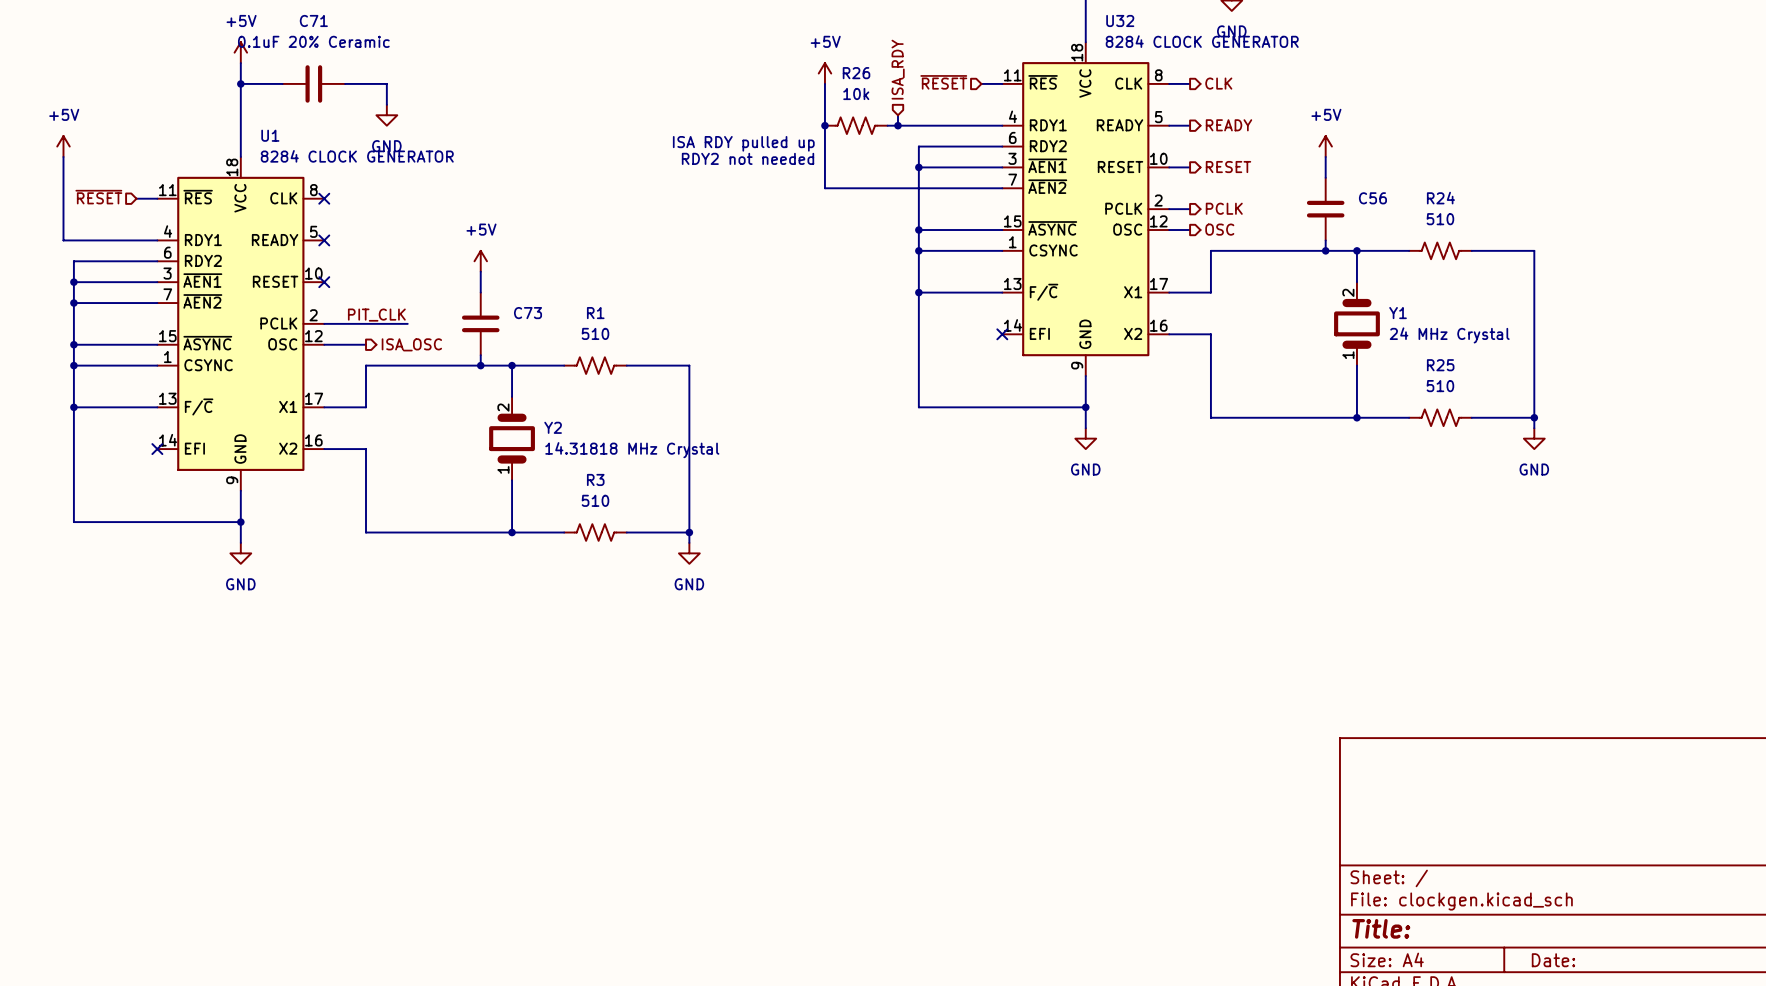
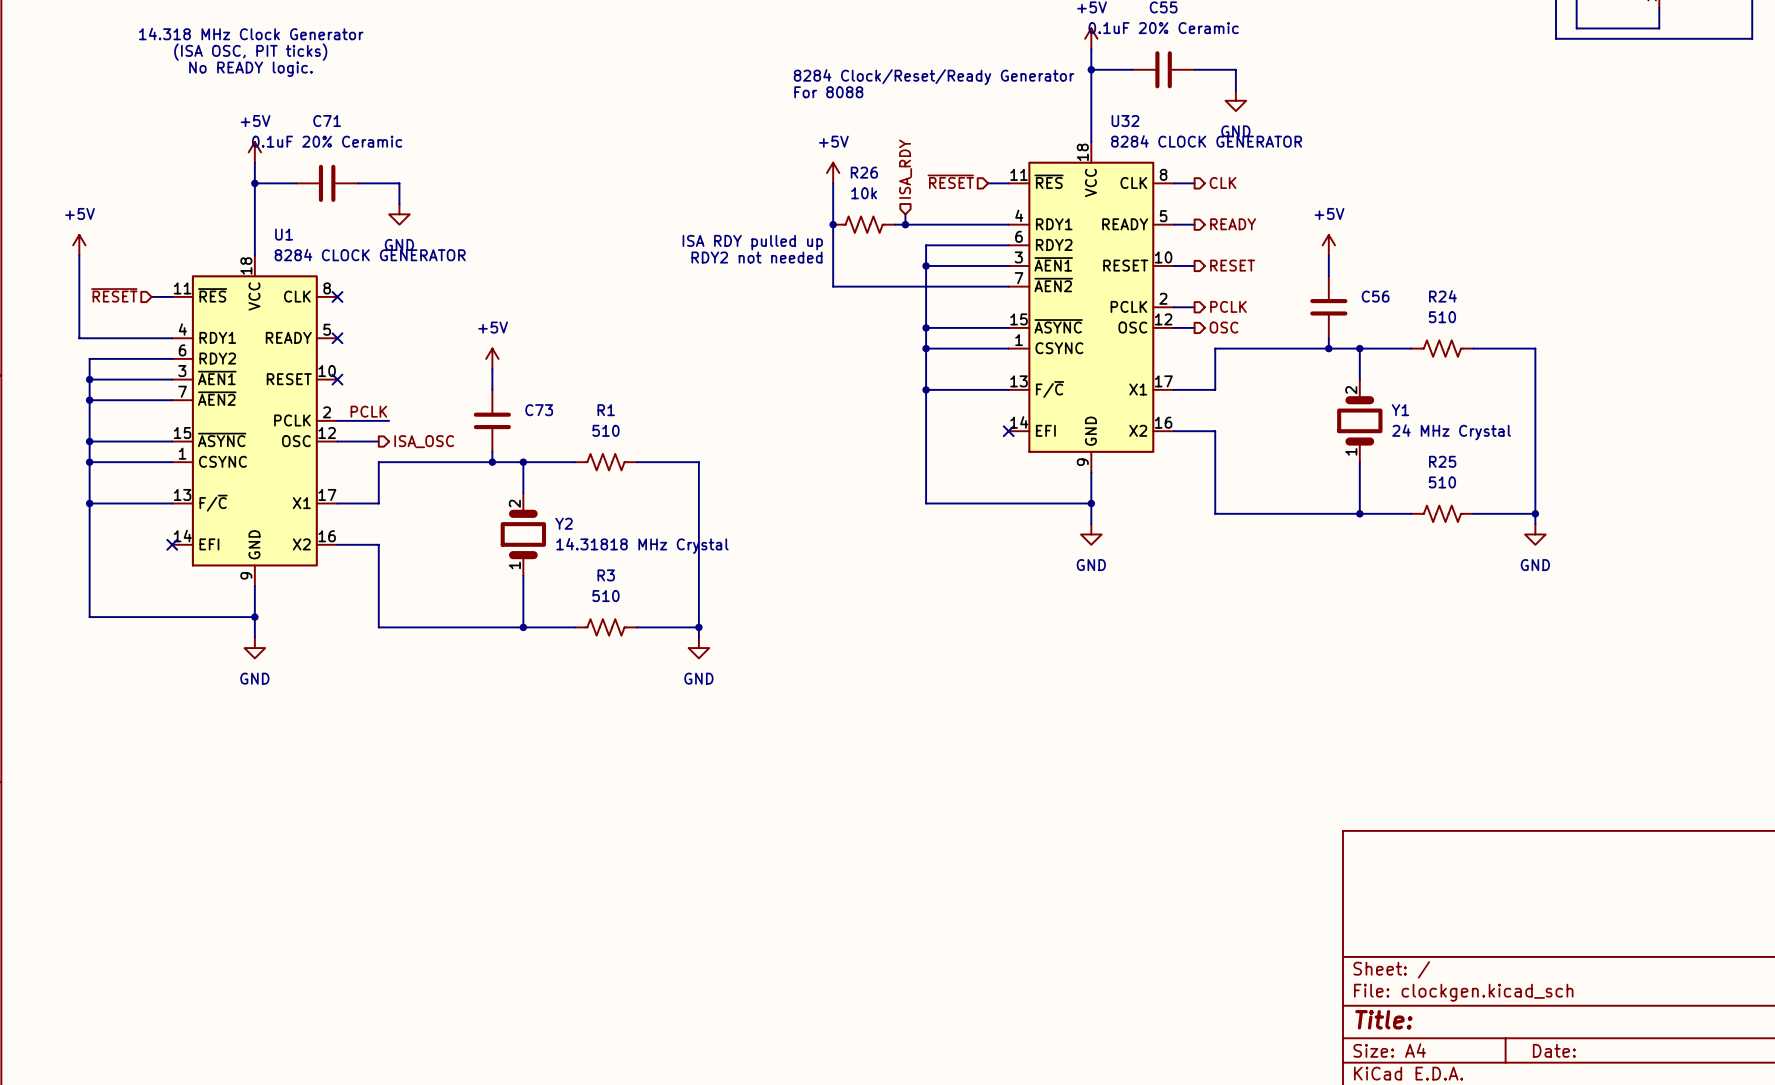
label: PIT_CLK (376, 315) -> PCLK (368, 411)
wire: (376, 323) (407, 323) -> none

